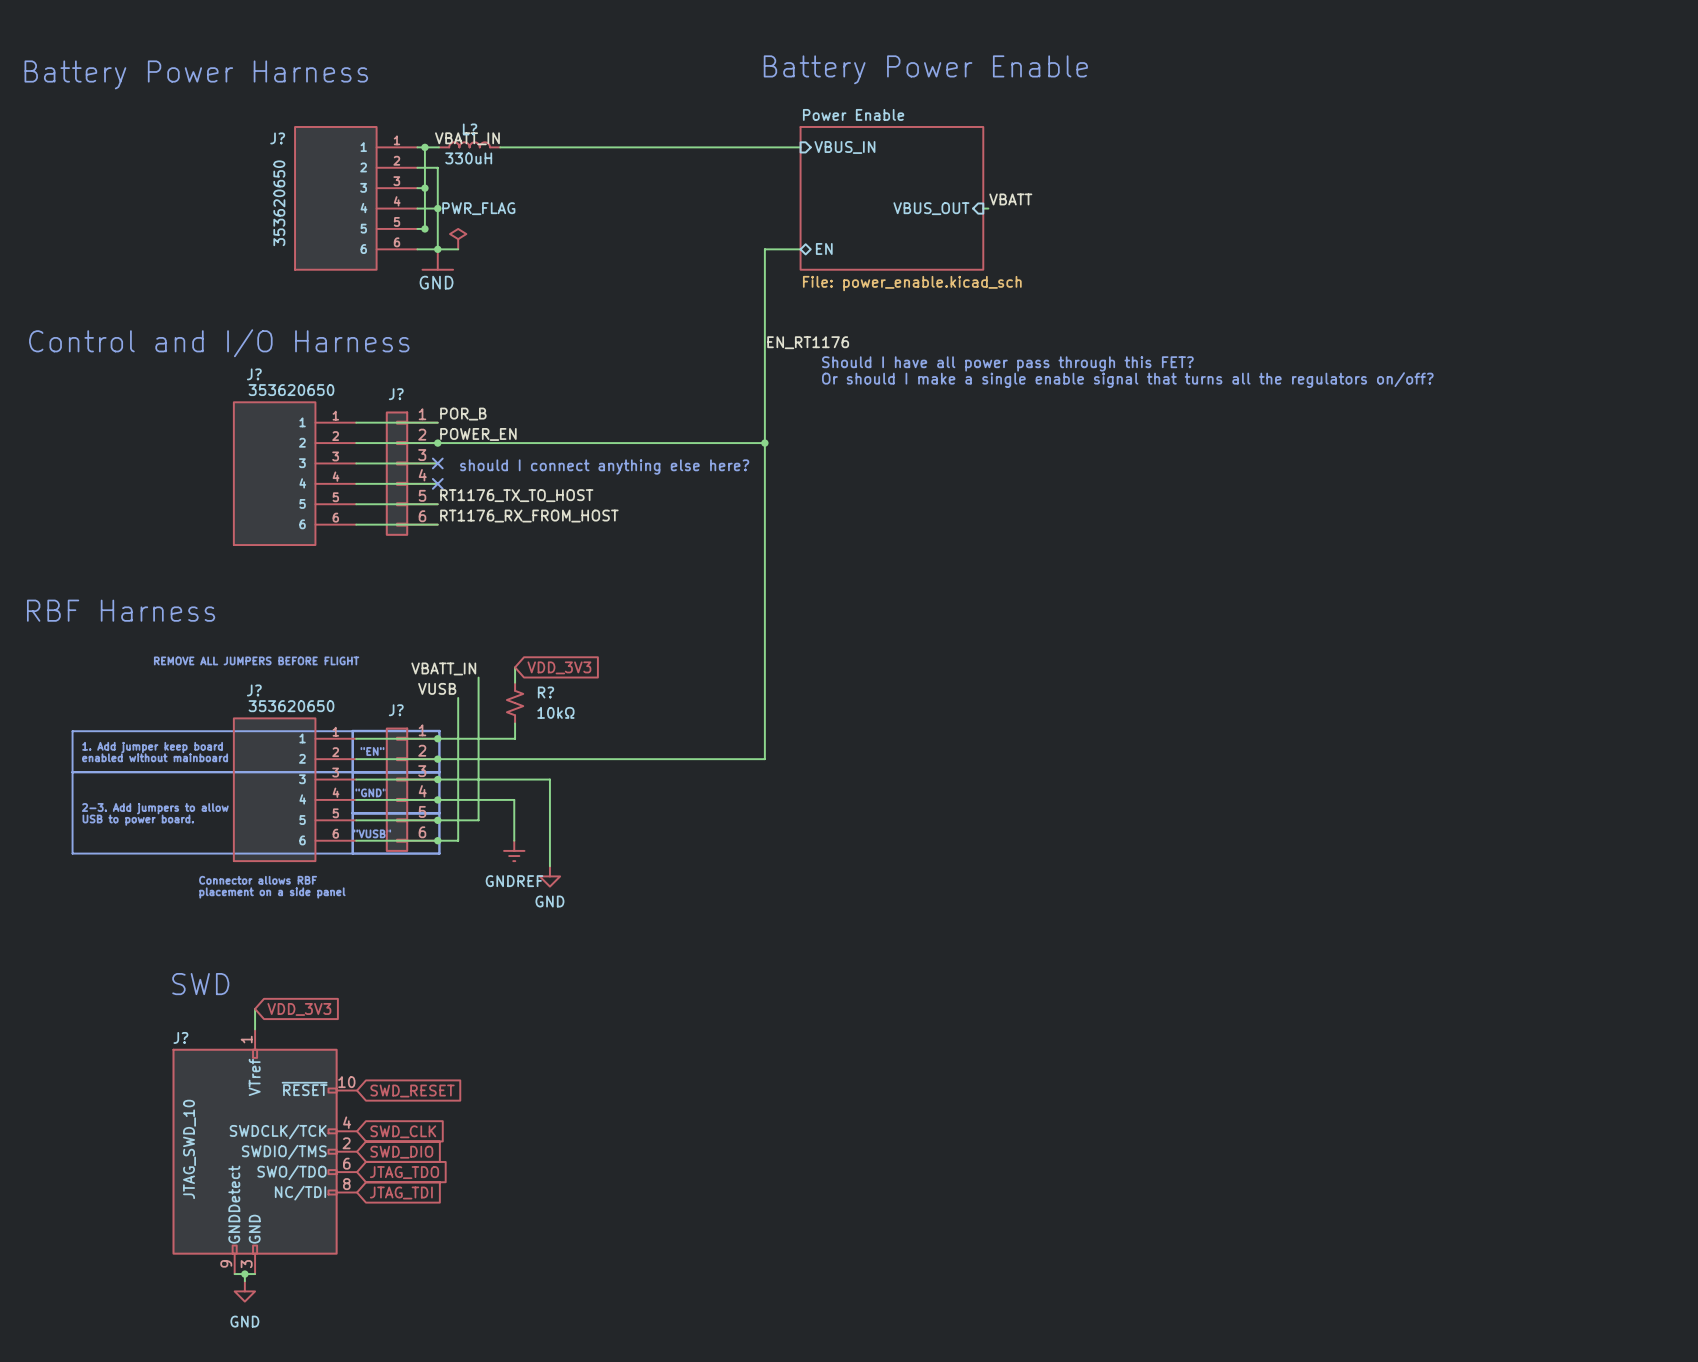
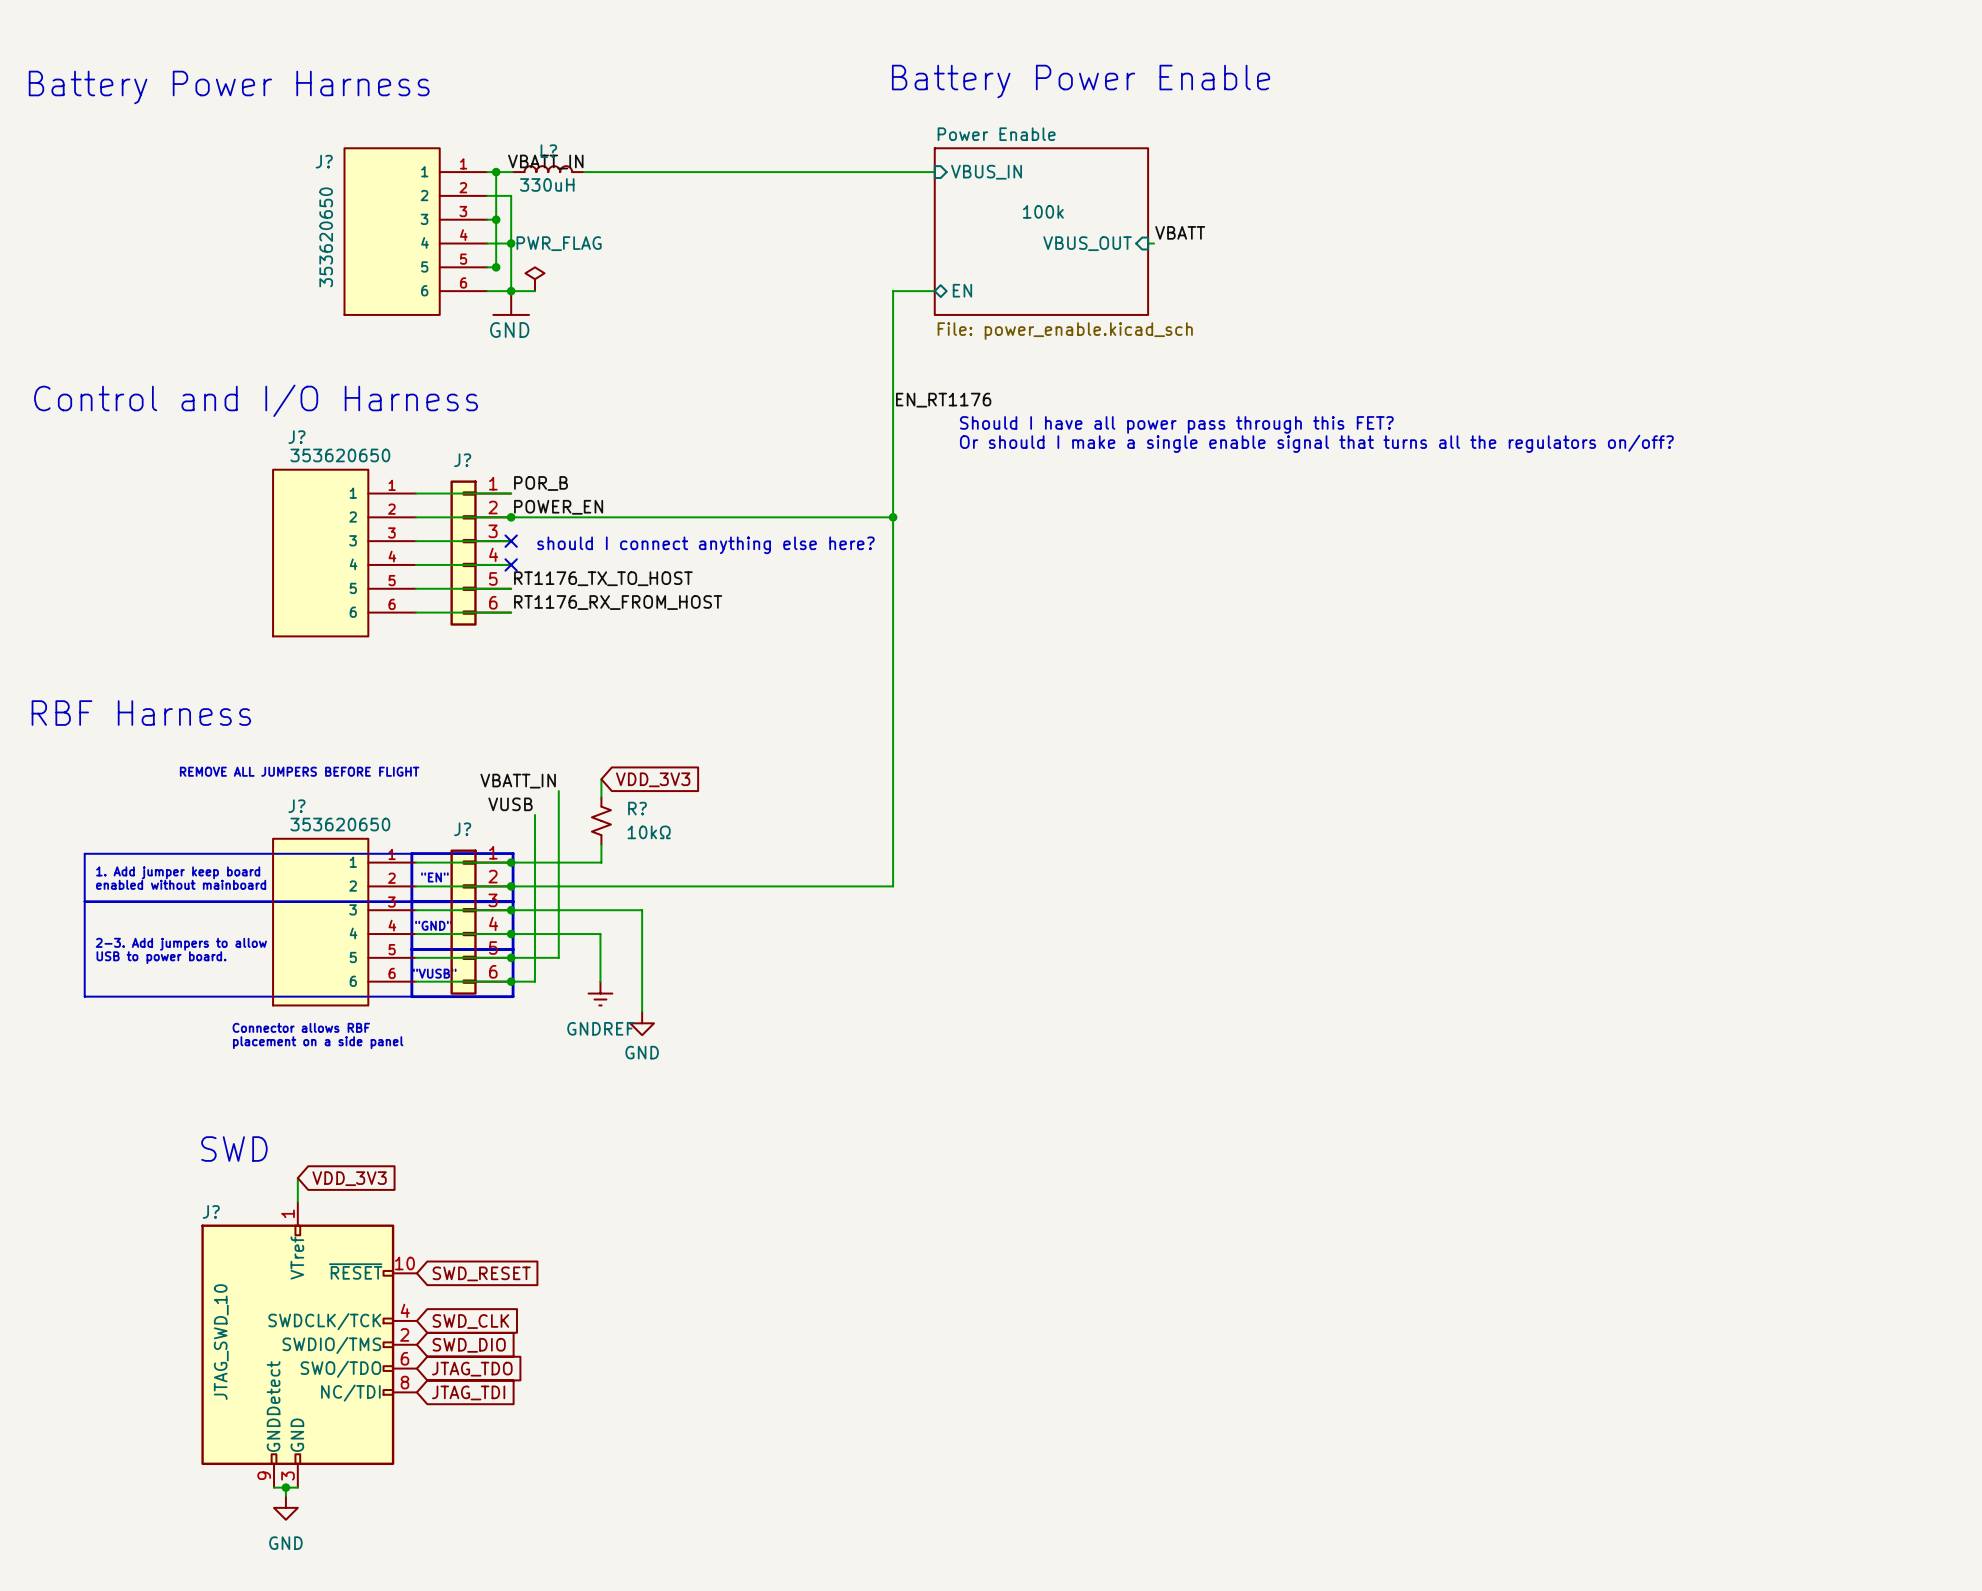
sheet Power Enable text: none -> 100k (1043, 211)

